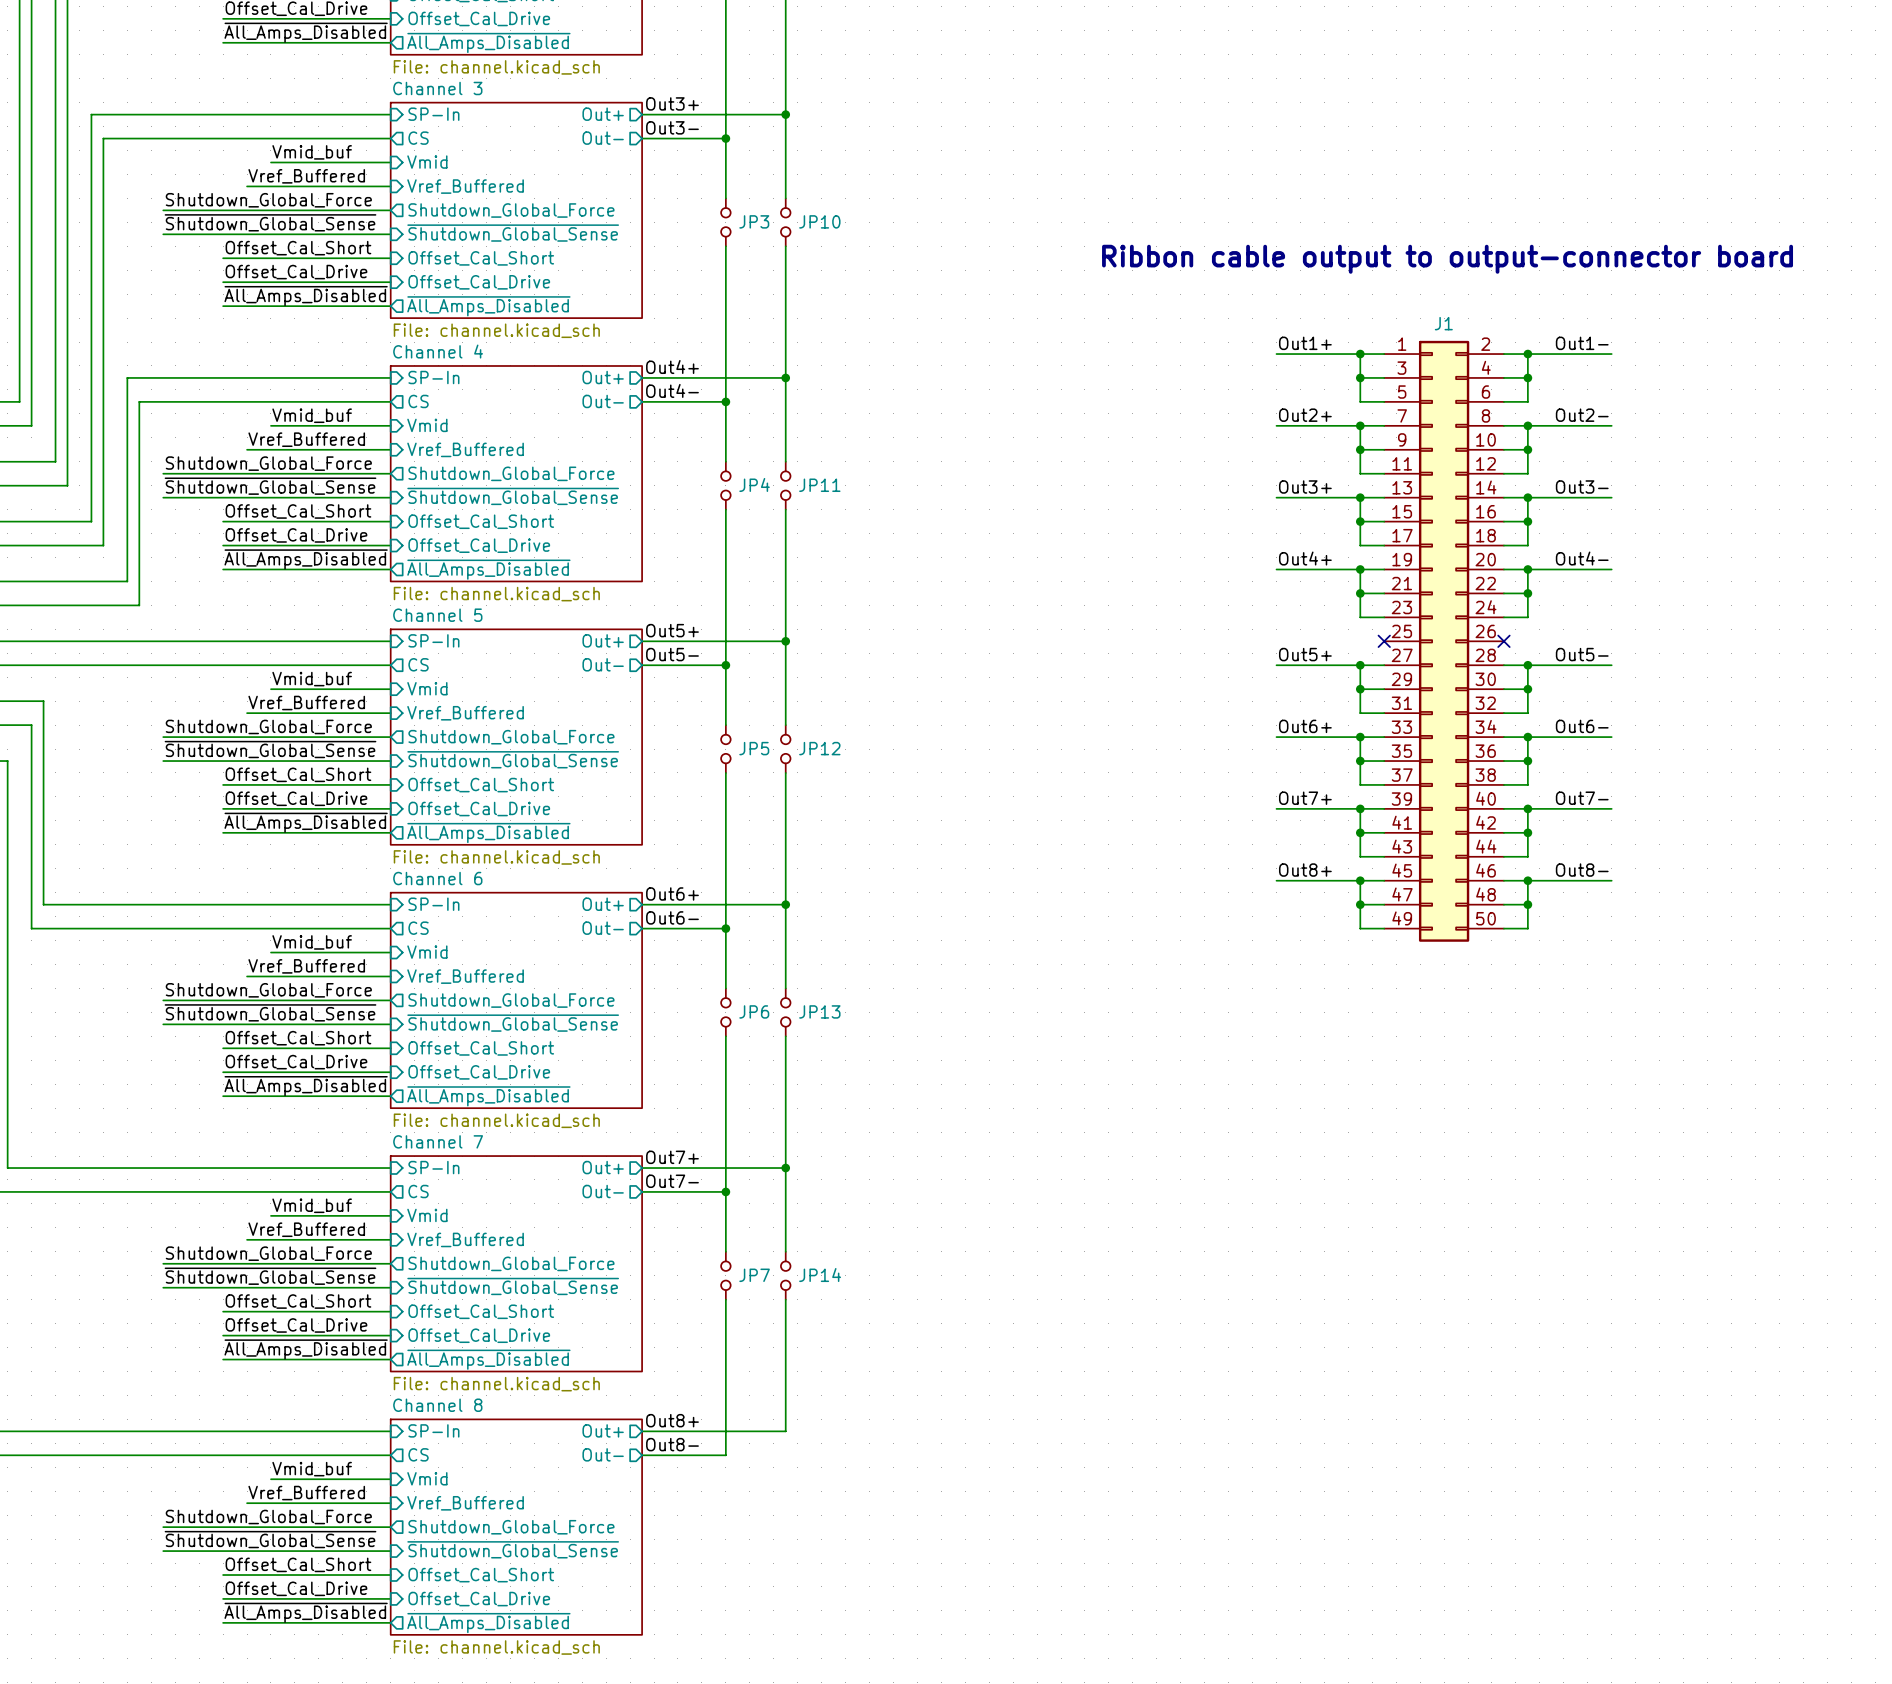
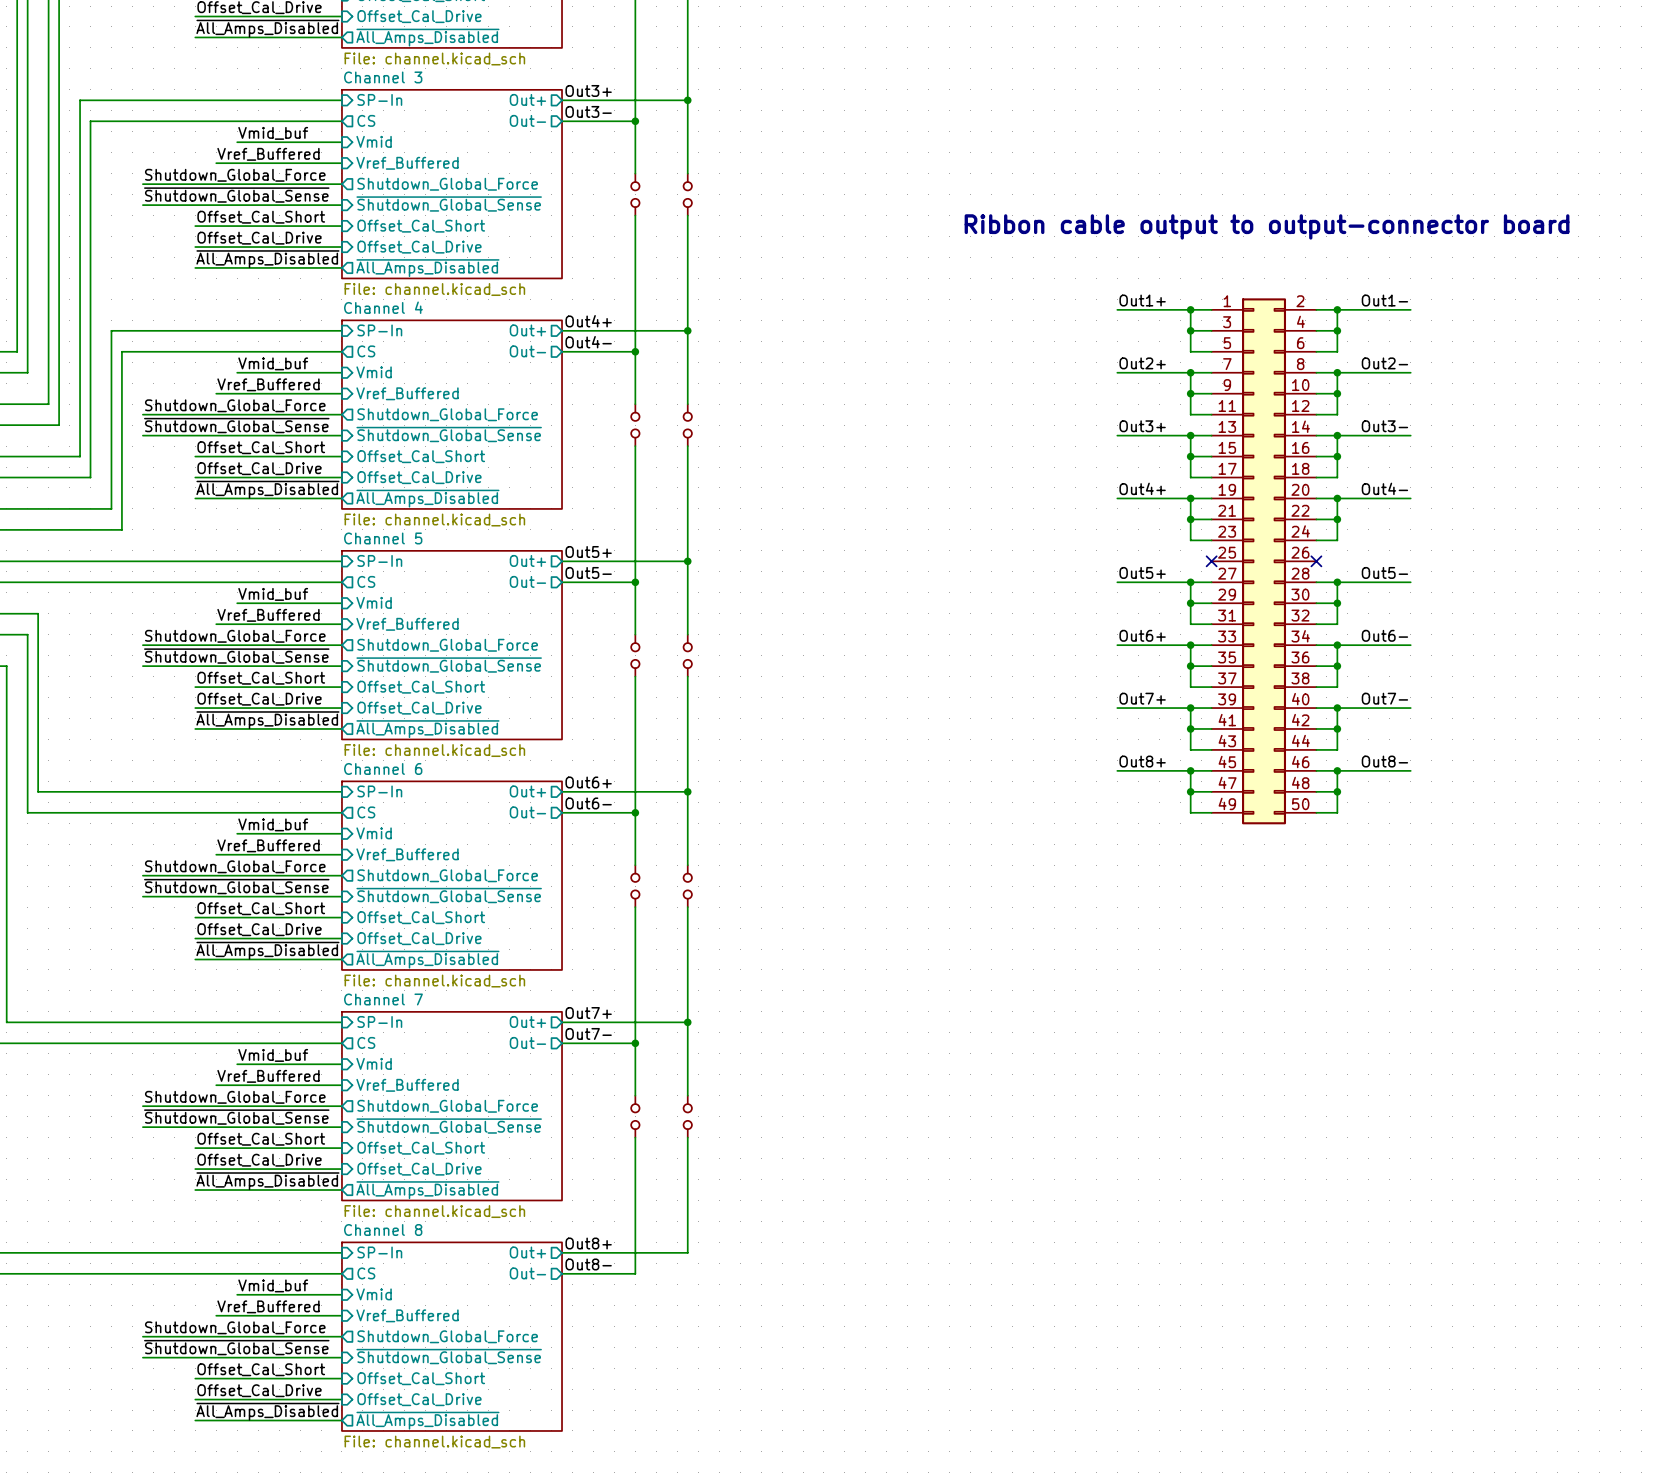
JP3 name: JP3 (754, 221) -> none
JP10 name: JP10 (819, 221) -> none
J1 name: J1 (1443, 323) -> none
JP4 name: JP4 (754, 484) -> none
JP11 name: JP11 (819, 485) -> none
JP5 name: JP5 (754, 748) -> none
JP12 name: JP12 (819, 748) -> none
JP6 name: JP6 (754, 1011) -> none
JP13 name: JP13 (819, 1011) -> none
JP7 name: JP7 (754, 1275) -> none
JP14 name: JP14 (820, 1275) -> none

